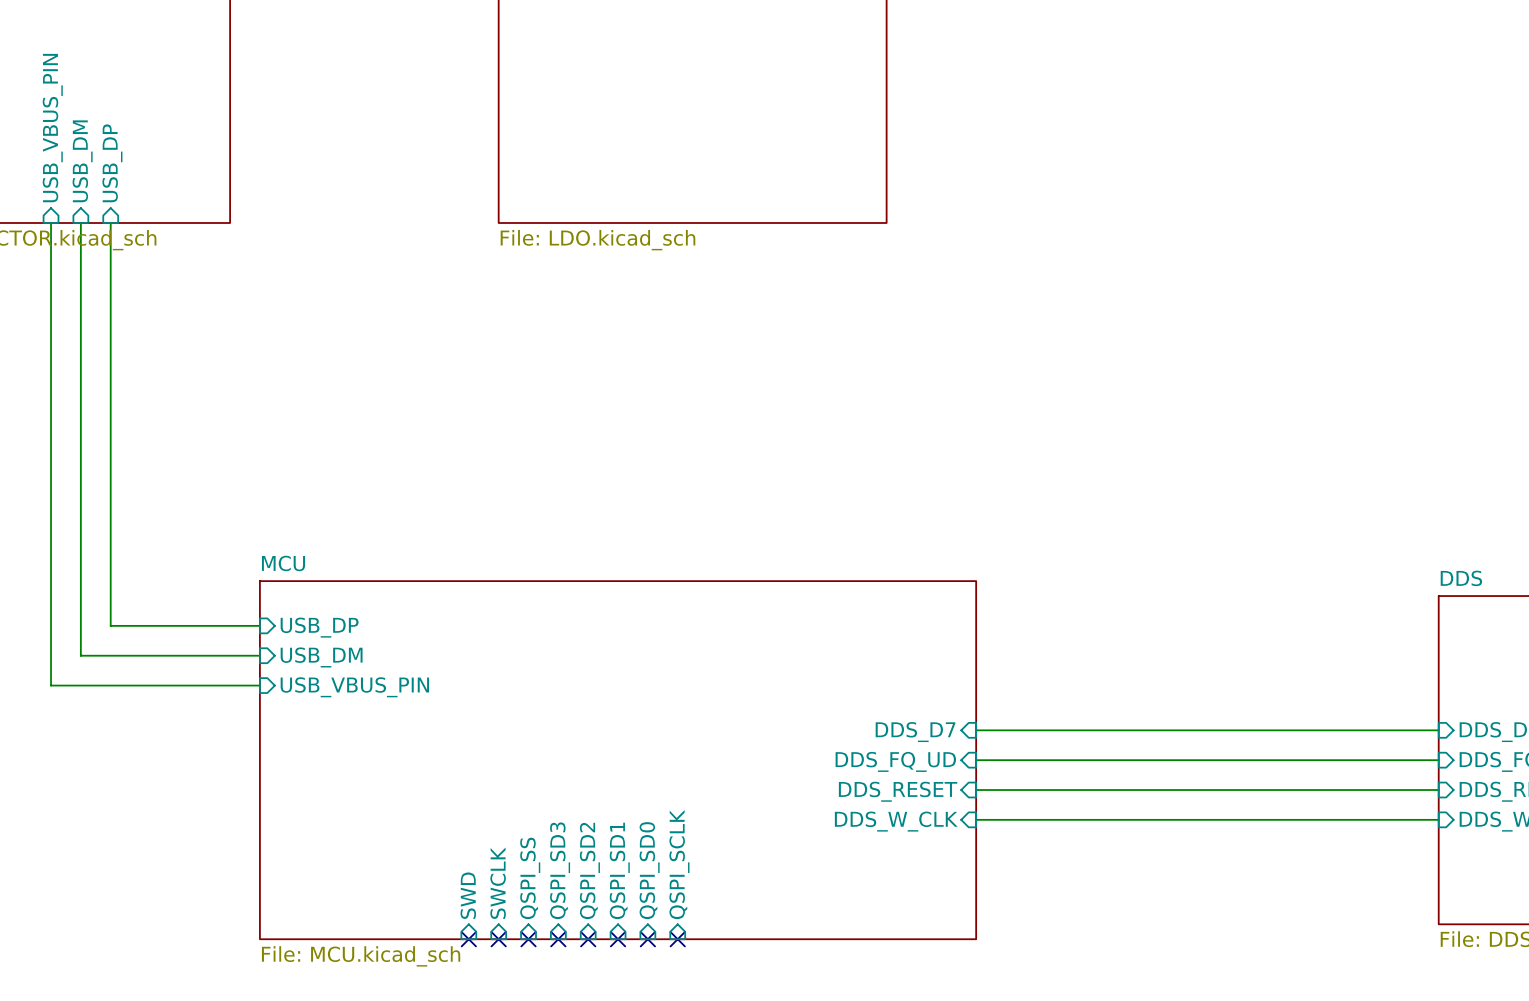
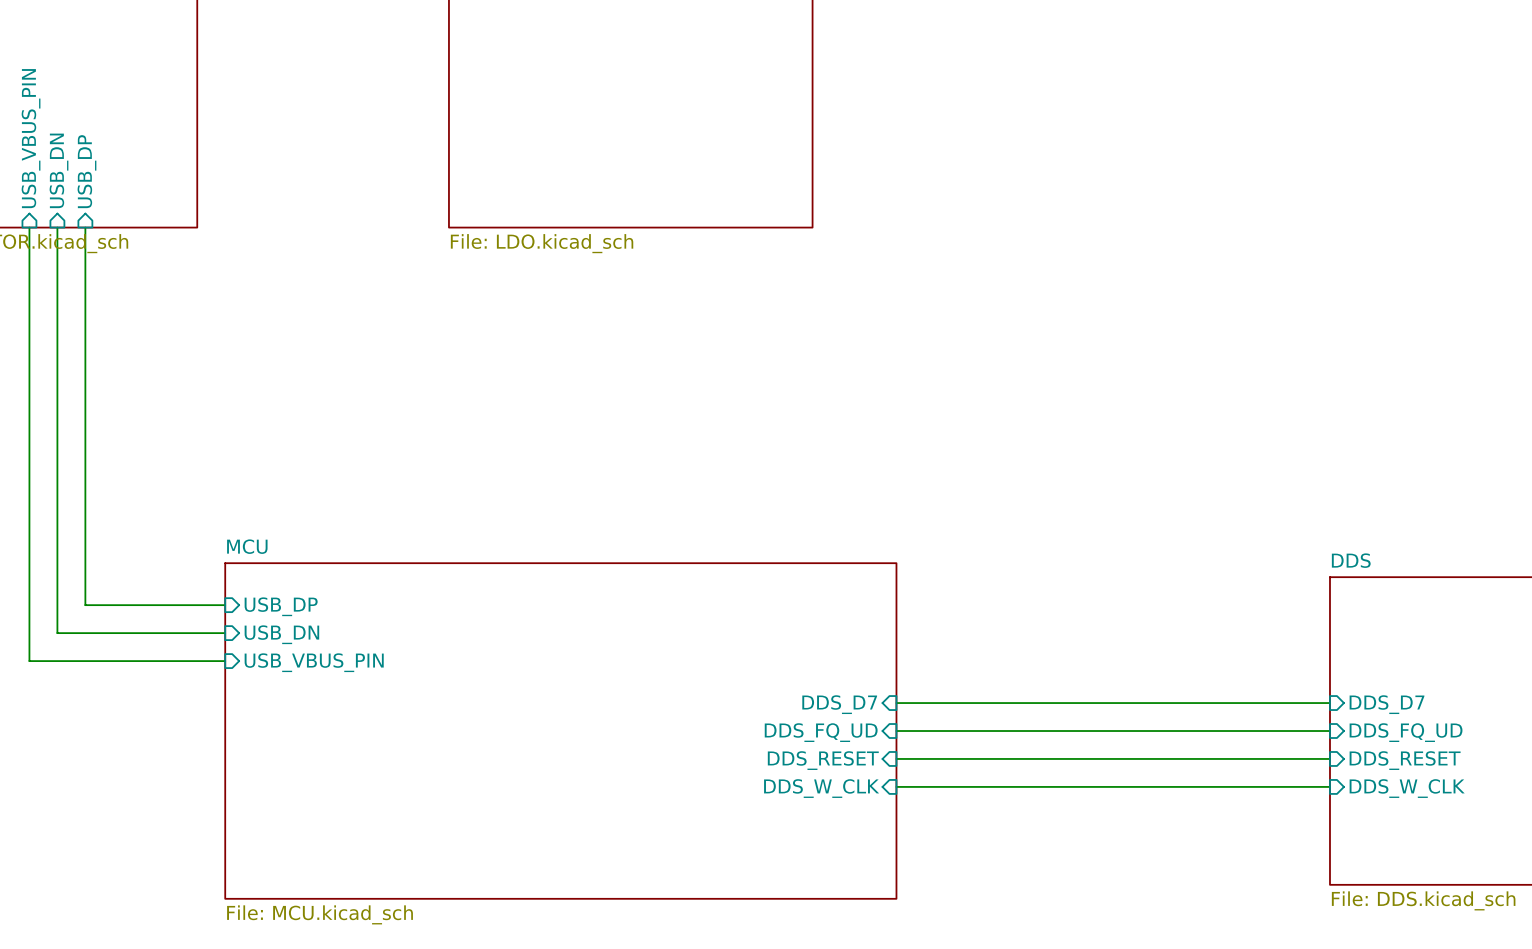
sheet pin: USB_DM (82, 161) -> USB_DN (59, 170)
sheet pin: USB_DM (321, 657) -> USB_DN (281, 634)
sheet pin: QSPI_SCLK (679, 864) -> none
sheet pin: QSPI_SD3 (560, 870) -> none
sheet pin: QSPI_SD2 (589, 870) -> none
sheet pin: QSPI_SD1 (619, 870) -> none
sheet pin: QSPI_SD0 (649, 870) -> none
sheet pin: QSPI_SS (530, 878) -> none
sheet pin: SWCLK (498, 883) -> none
sheet pin: SWD (468, 895) -> none
no-connect mark: (468, 939) -> none
no-connect mark: (498, 939) -> none
no-connect mark: (528, 939) -> none
no-connect mark: (558, 939) -> none
no-connect mark: (588, 939) -> none
no-connect mark: (618, 939) -> none
no-connect mark: (647, 939) -> none
no-connect mark: (677, 939) -> none

